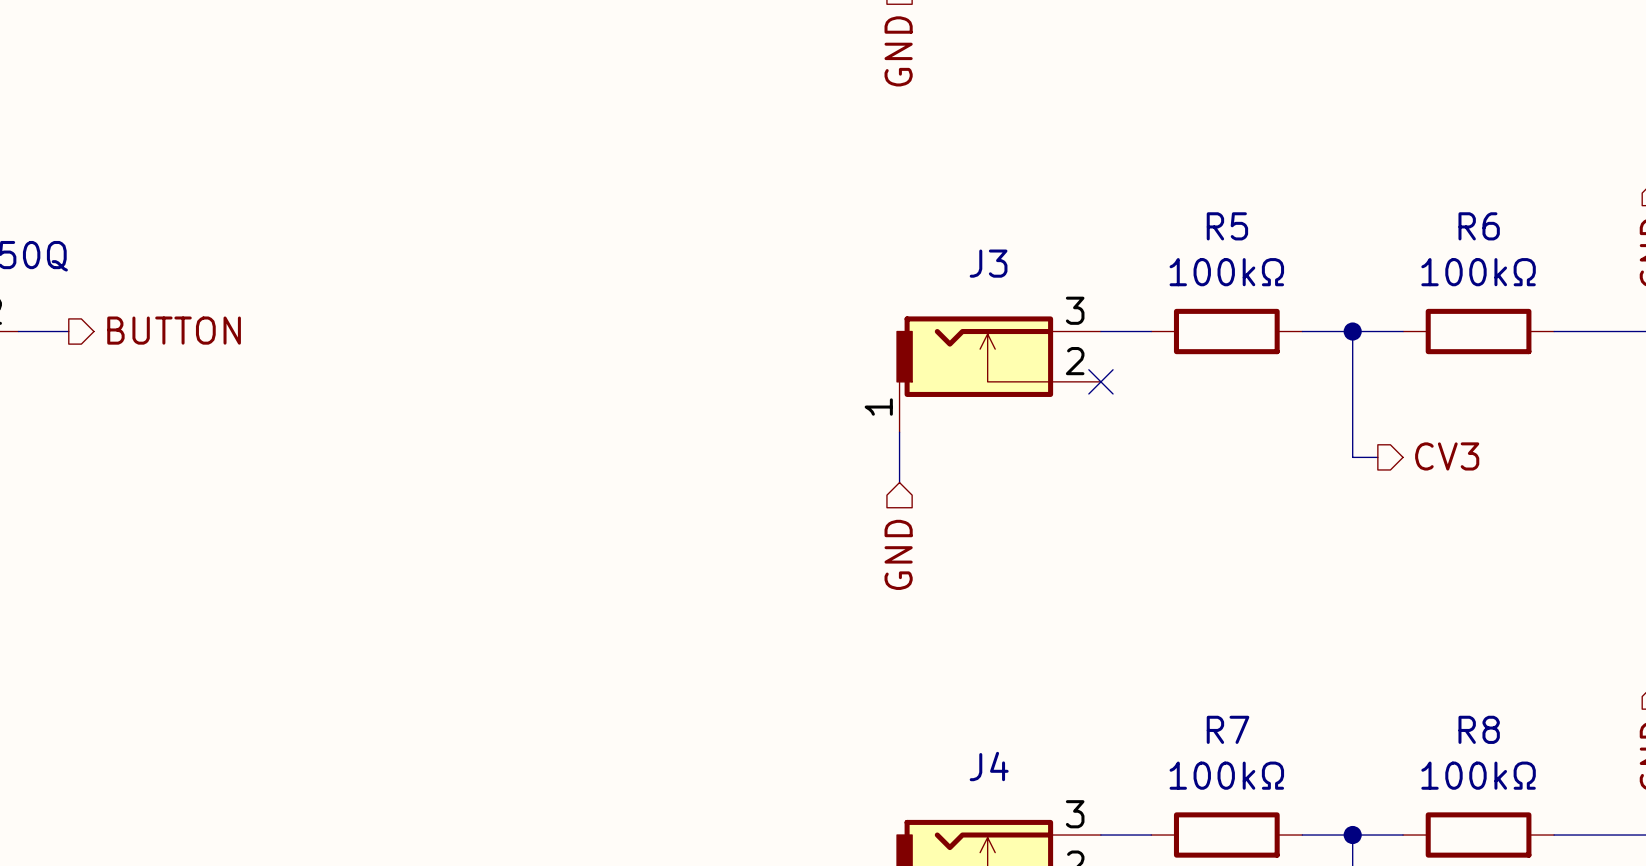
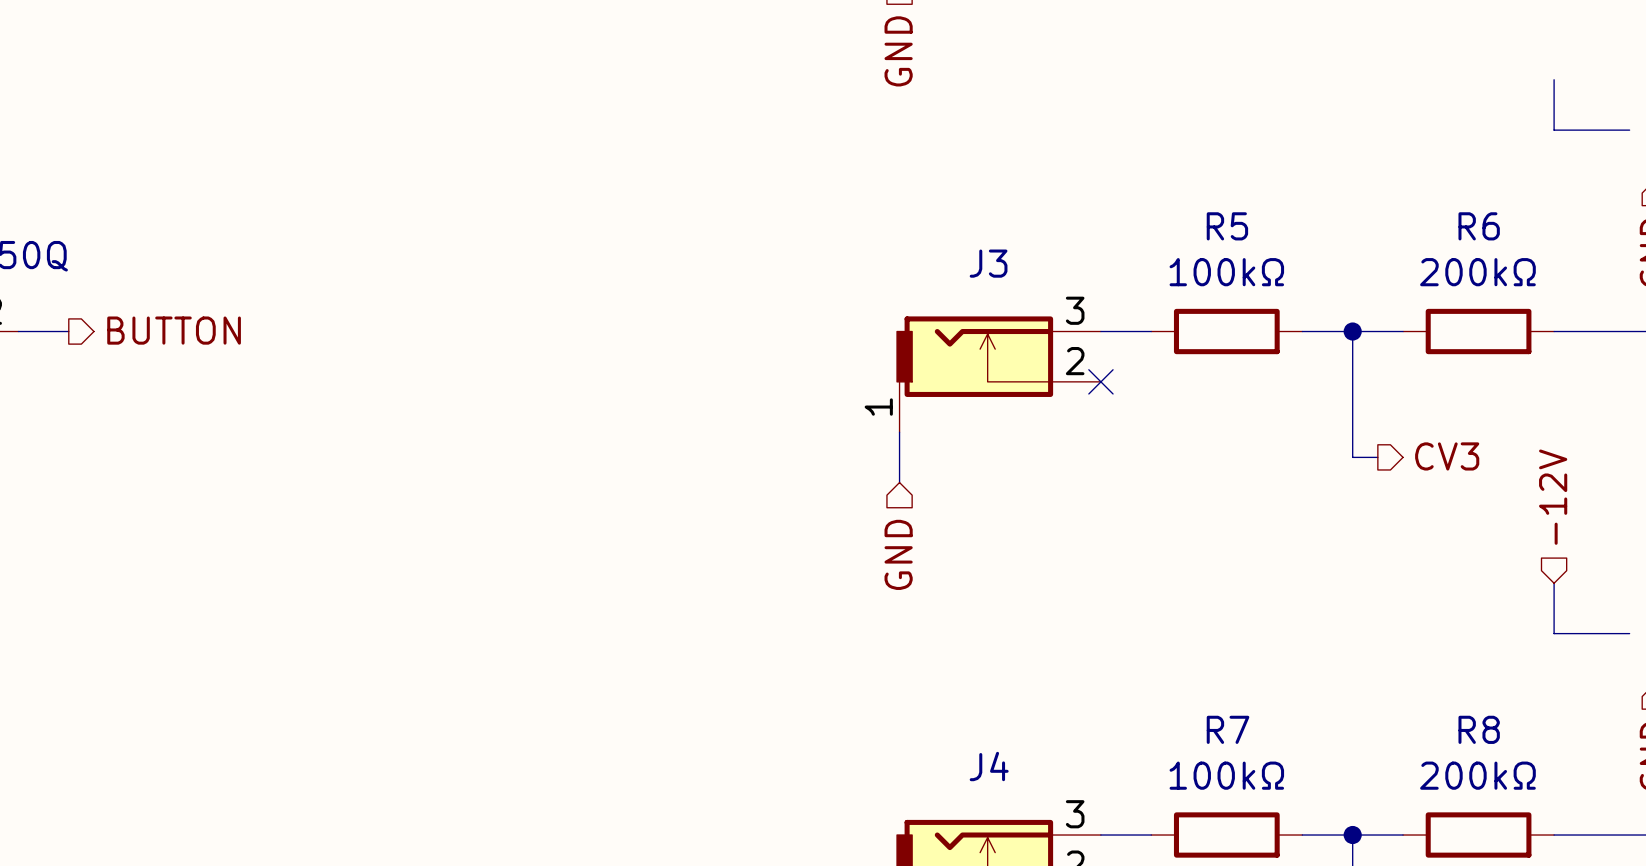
wire: none -> (1554, 79) (1554, 130) (1629, 130)
R6 value: 100kΩ (1478, 272) -> 200kΩ (1477, 272)
hierarchical label: none -> -12V (1553, 497)
wire: none -> (1554, 583) (1554, 633) (1629, 633)
R8 value: 100kΩ (1478, 775) -> 200kΩ (1477, 775)

